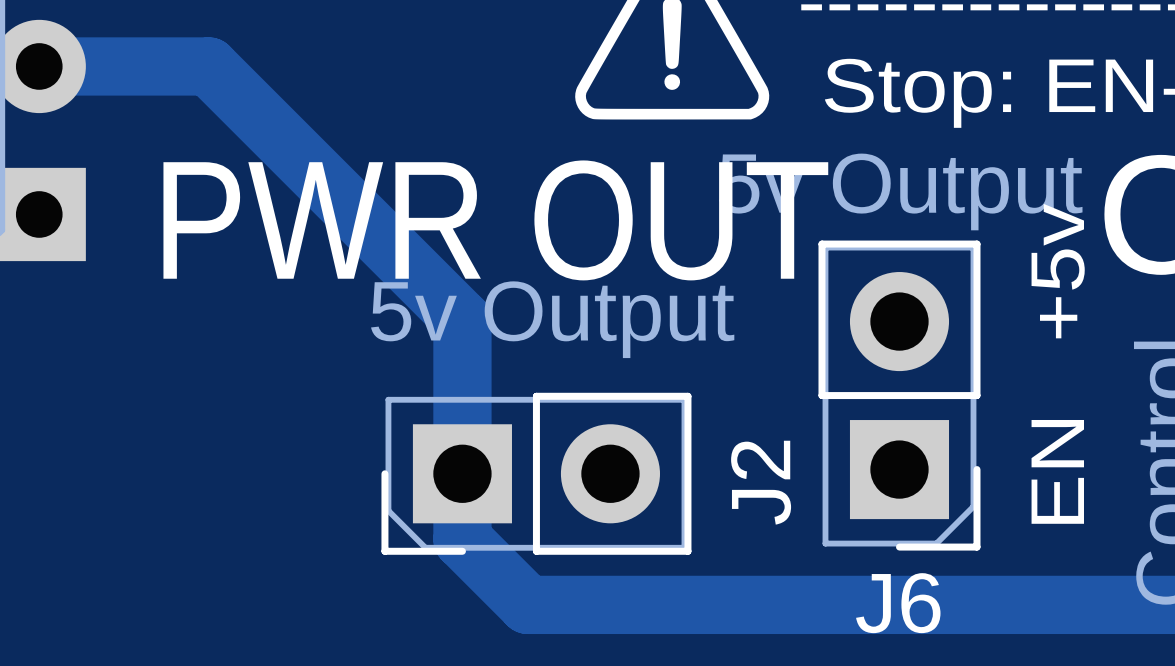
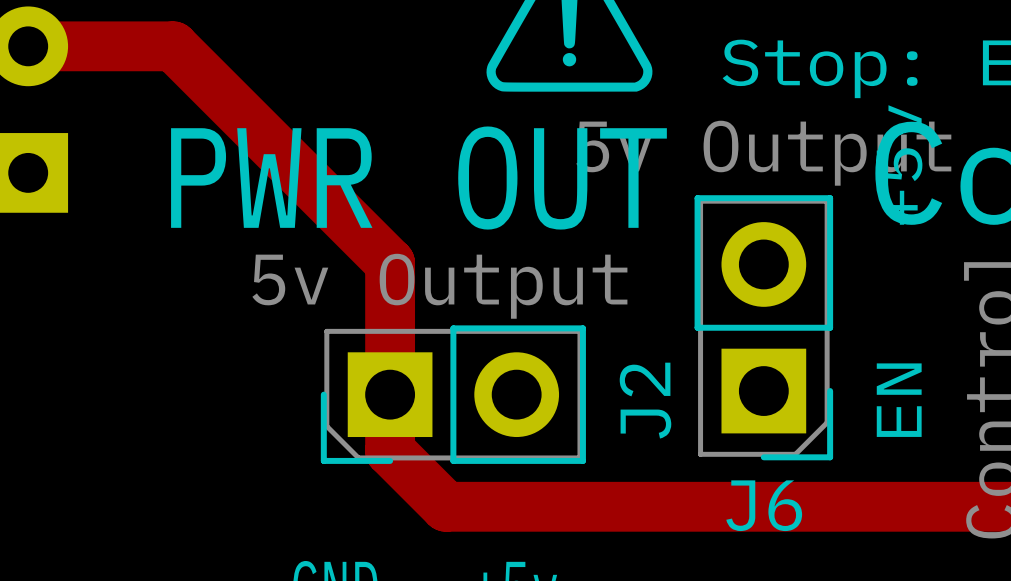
J2 value position: 5v Output (552, 319) -> 5v Output (439, 286)

